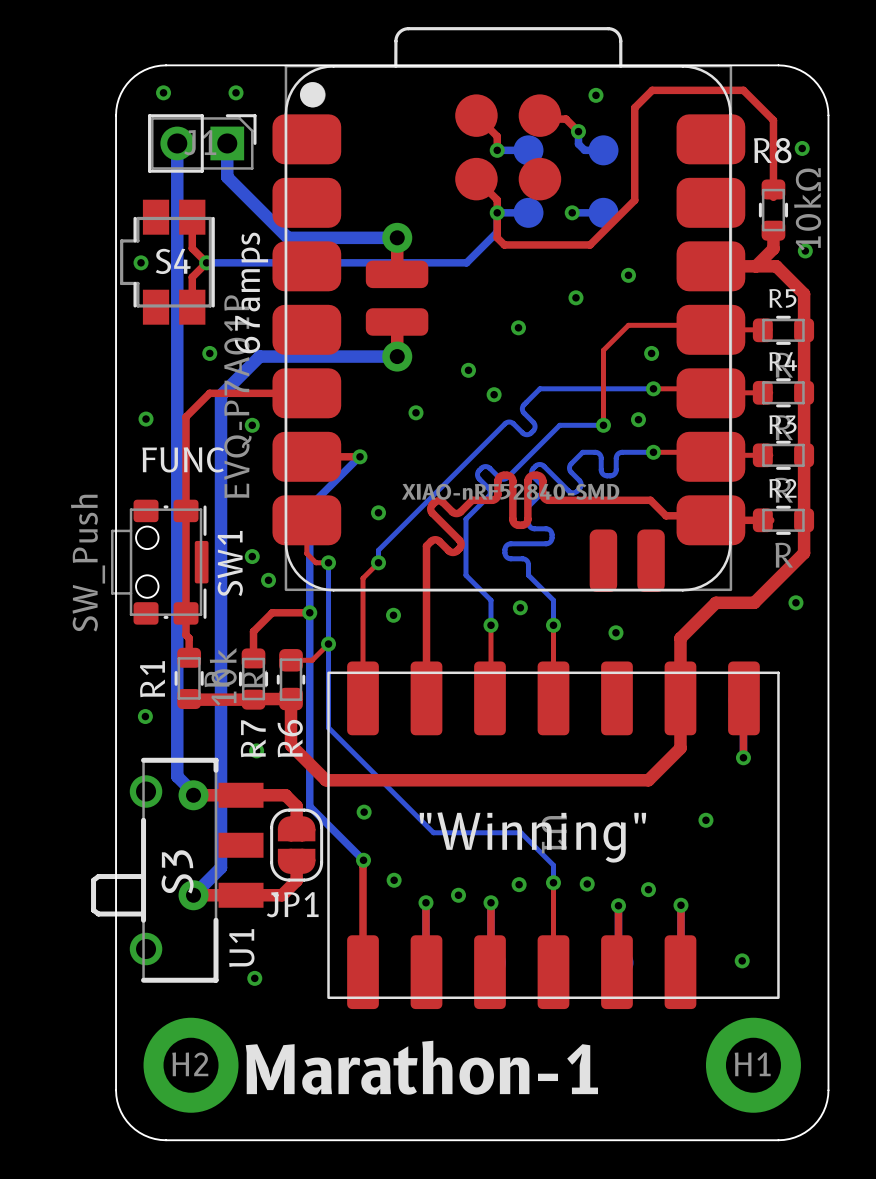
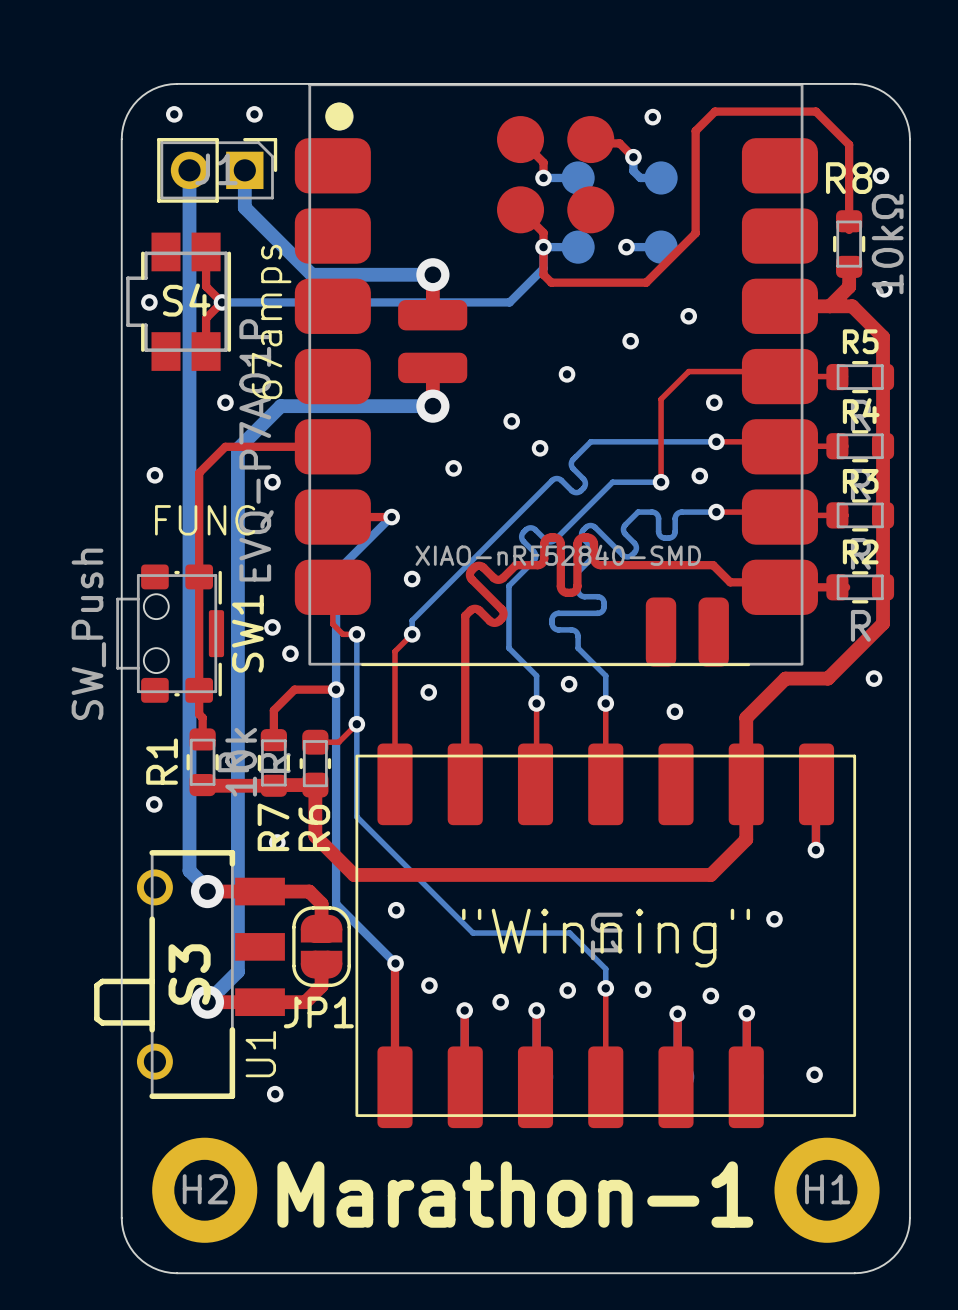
part footprint: [272, 27, 746, 592] -> [294, 83, 818, 667]

